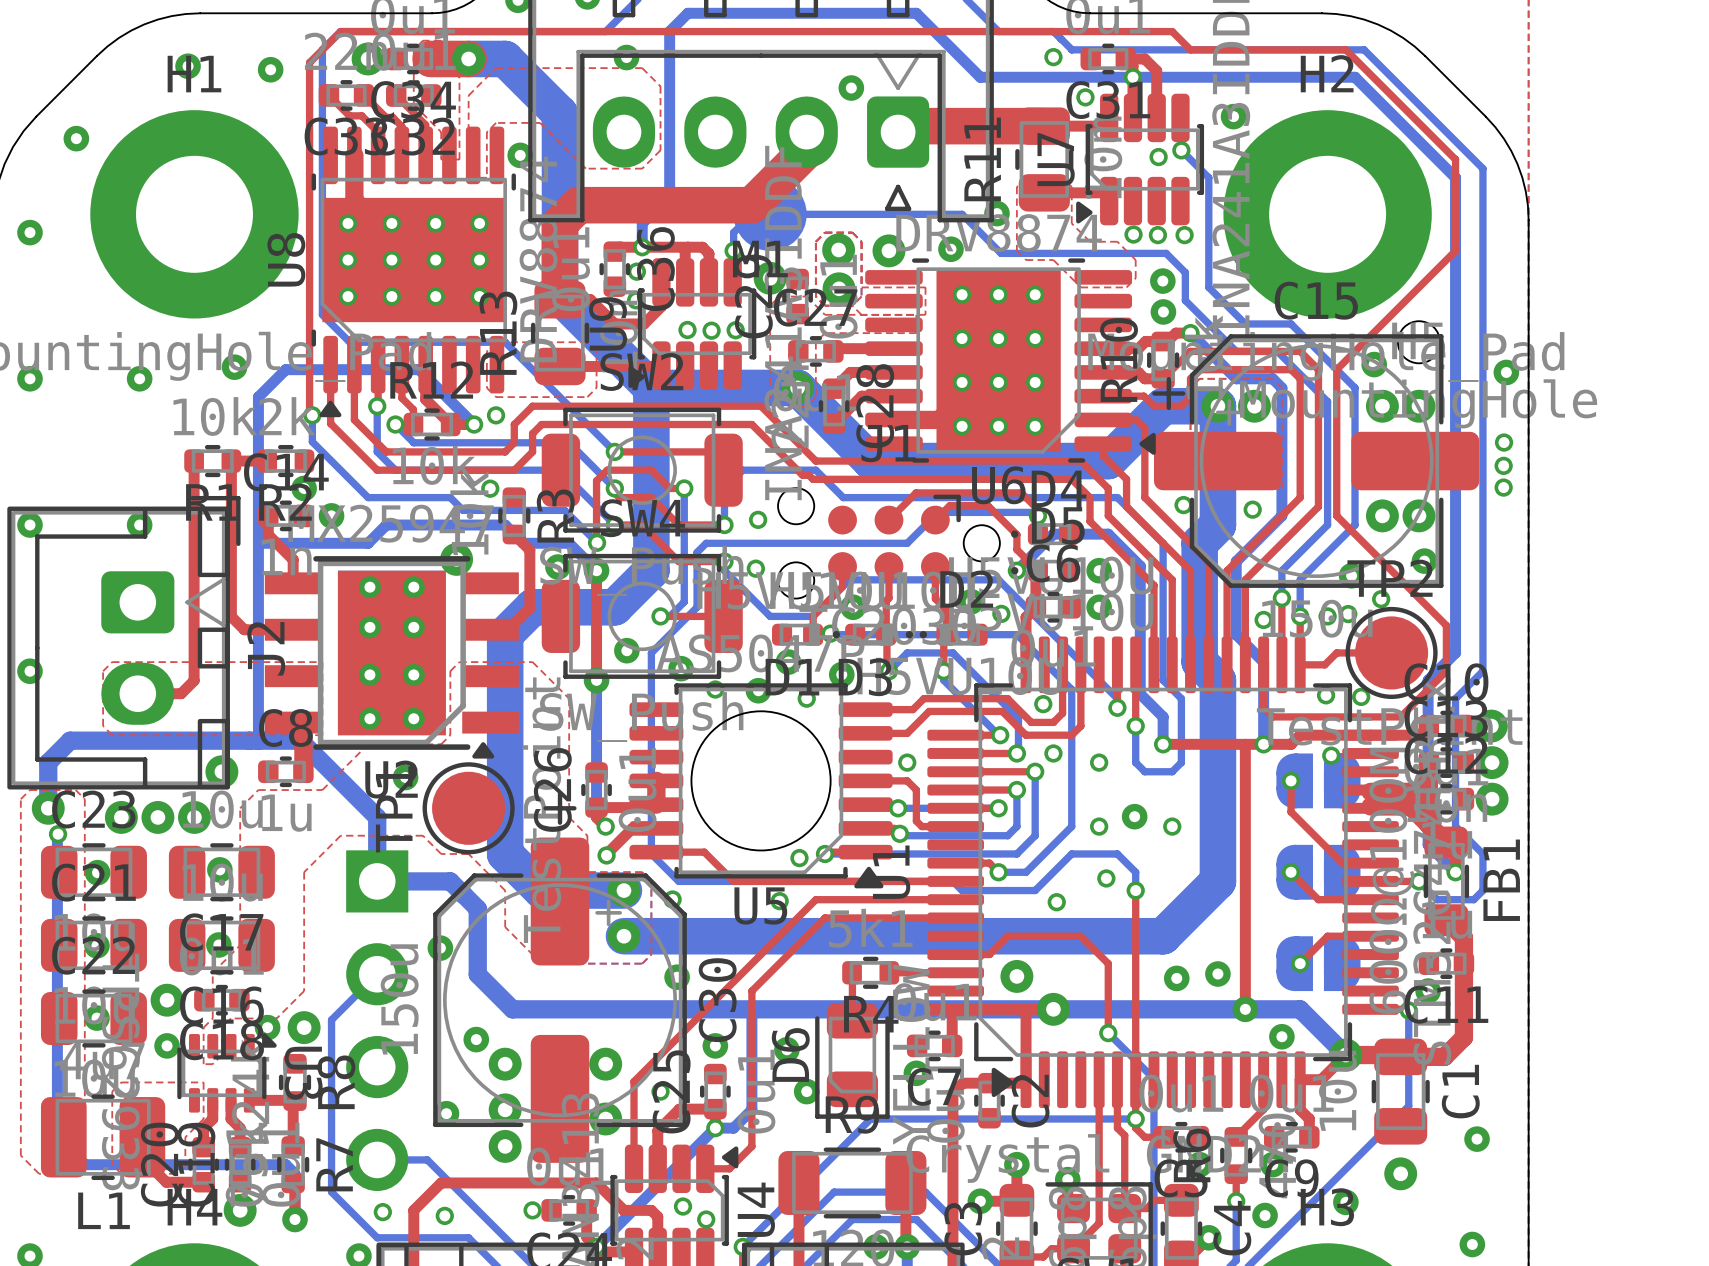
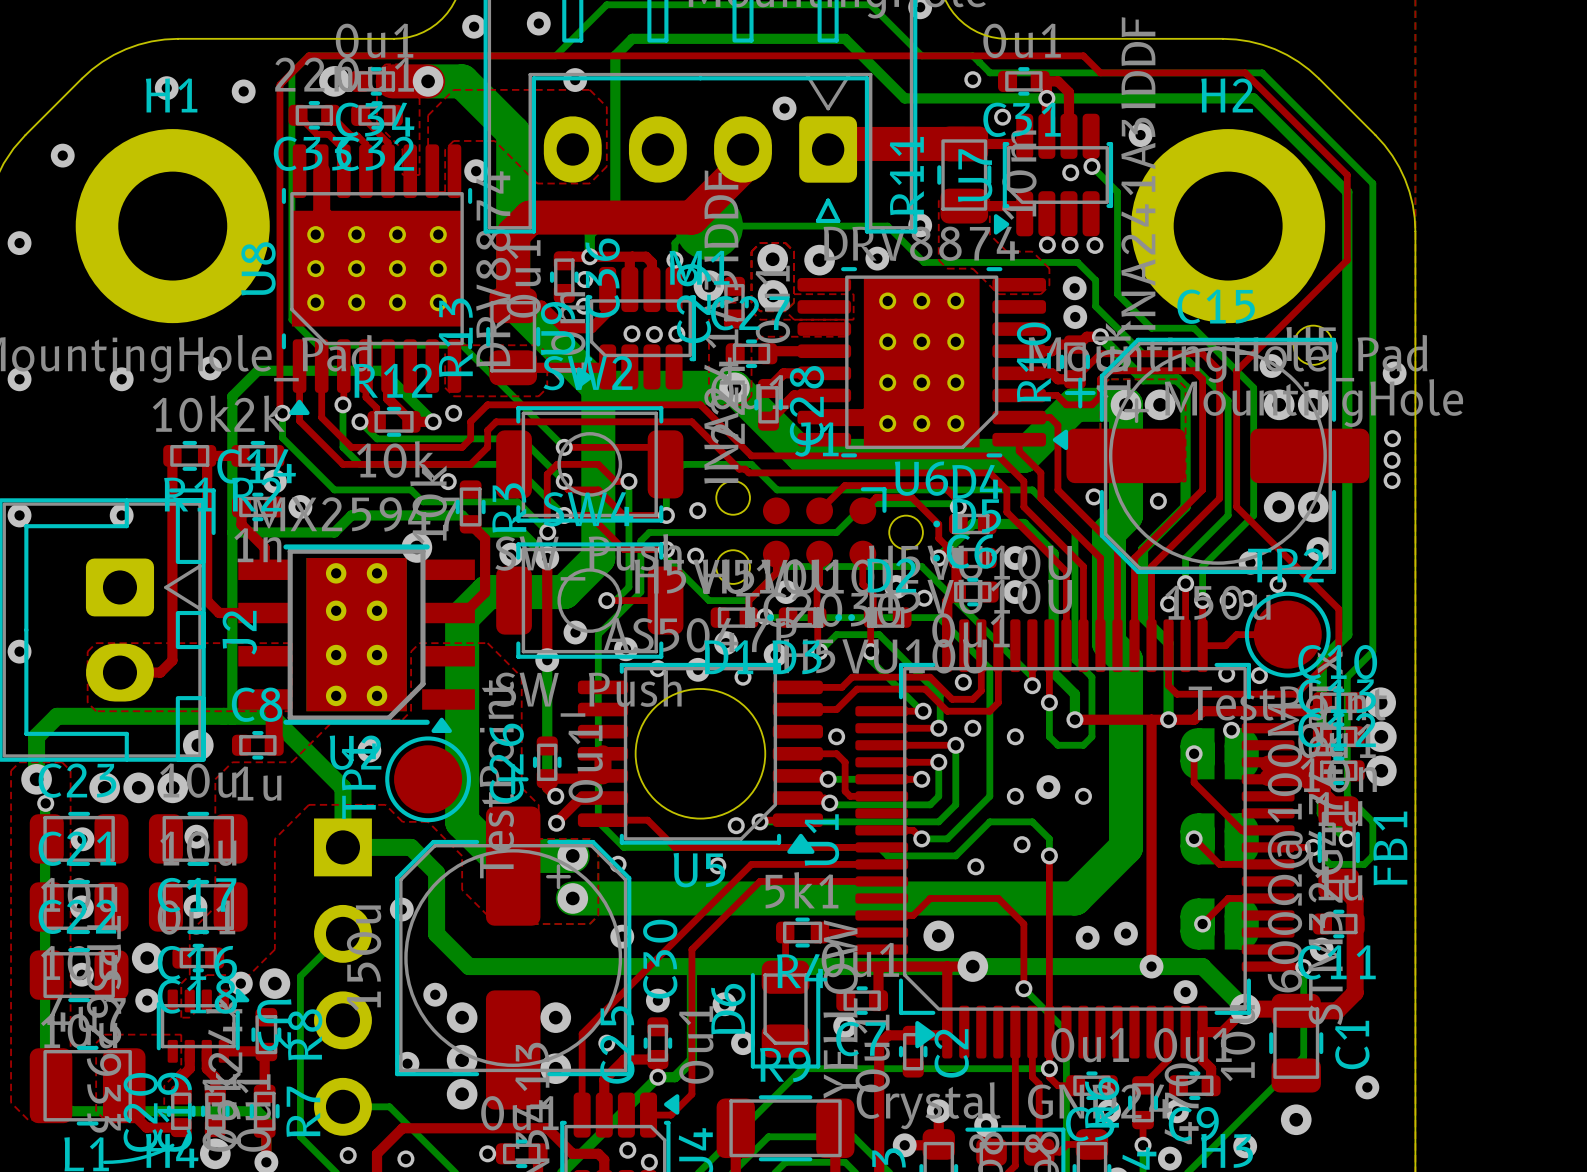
line: none -> (172, 1145) (139, 1158) (104, 1162)

